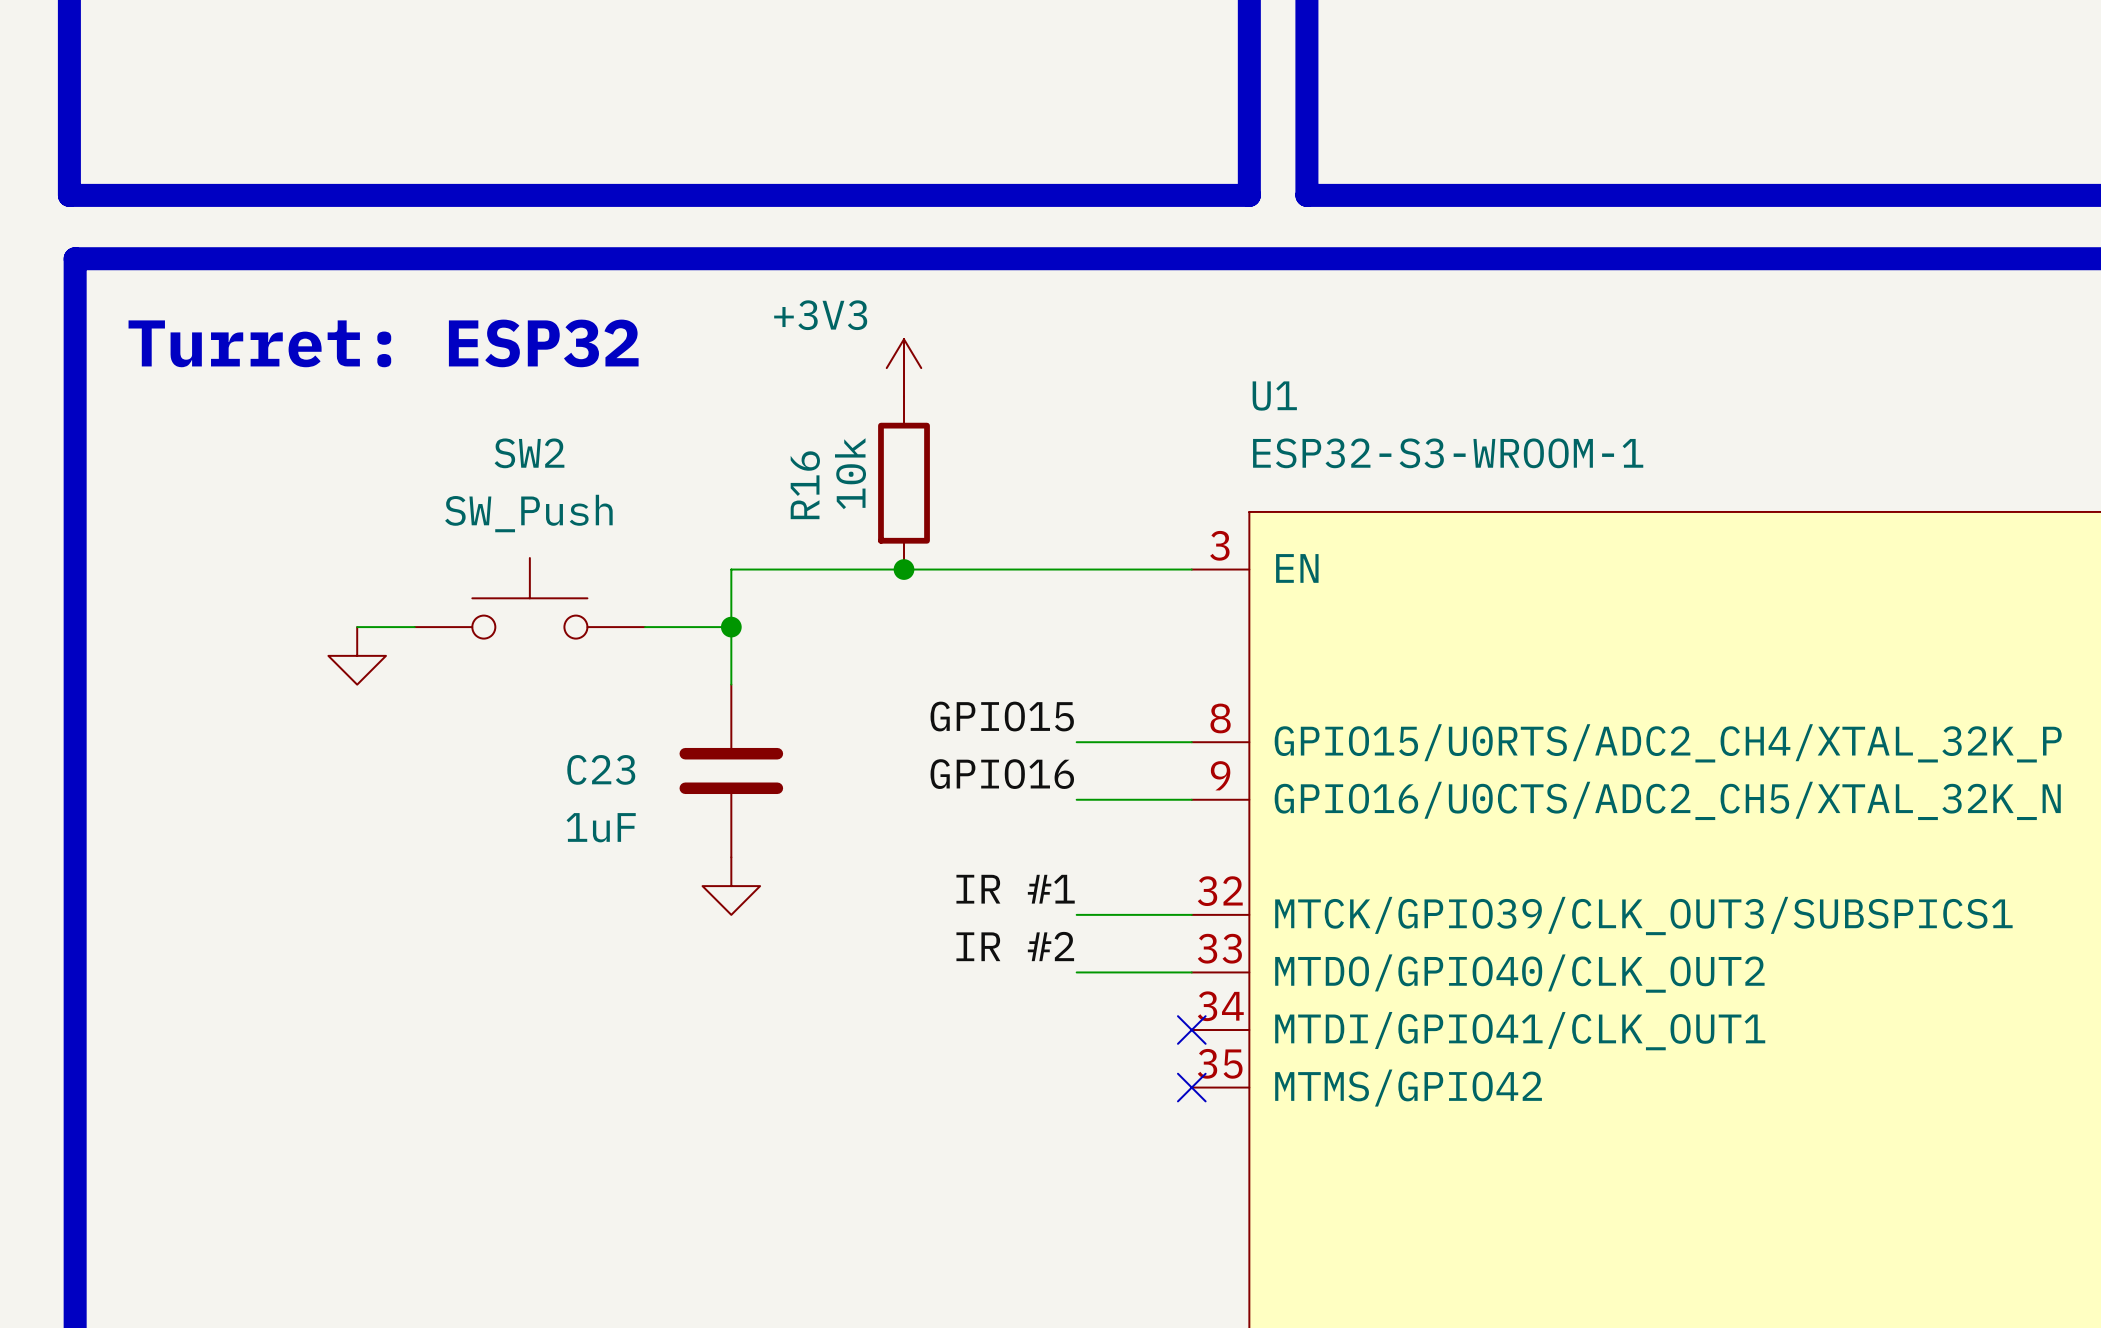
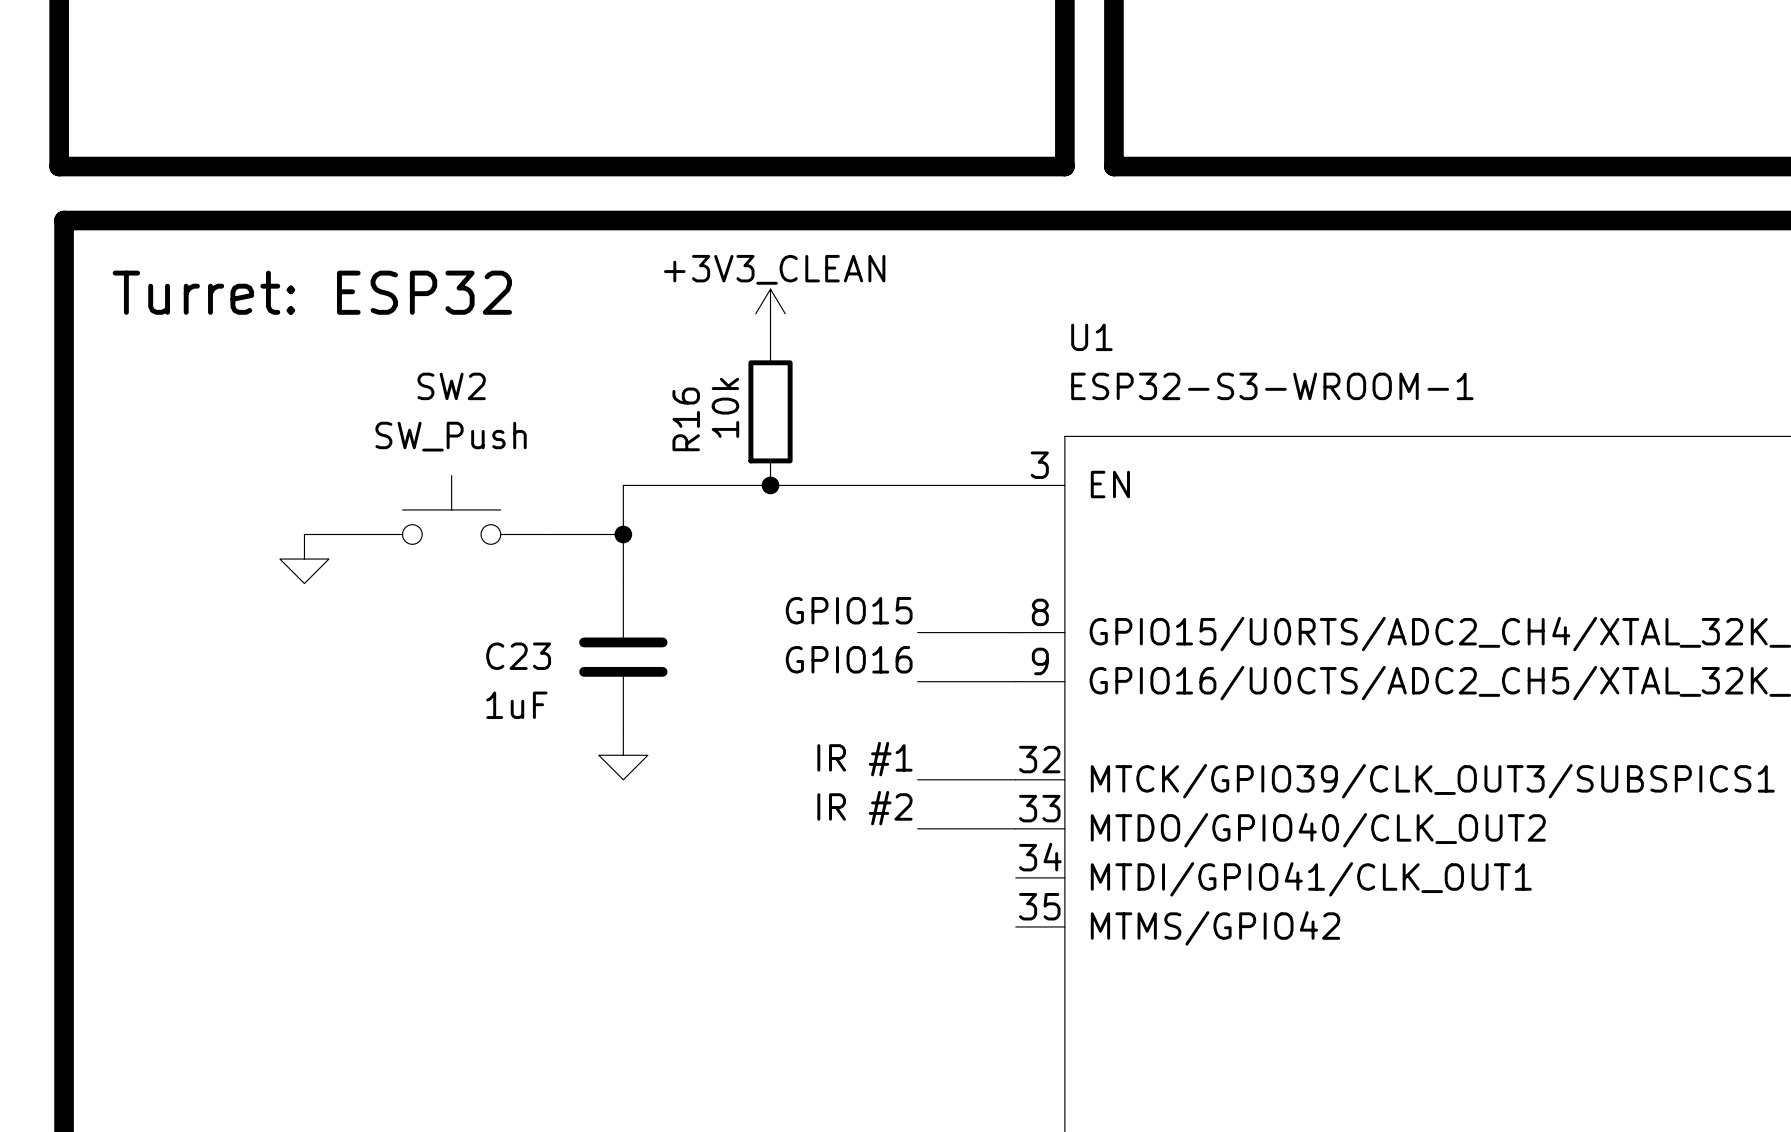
power symbol: +3V3 (904, 368) -> +3V3_CLEAN (770, 313)
no-connect mark: (1191, 1030) -> none
no-connect mark: (1191, 1087) -> none

